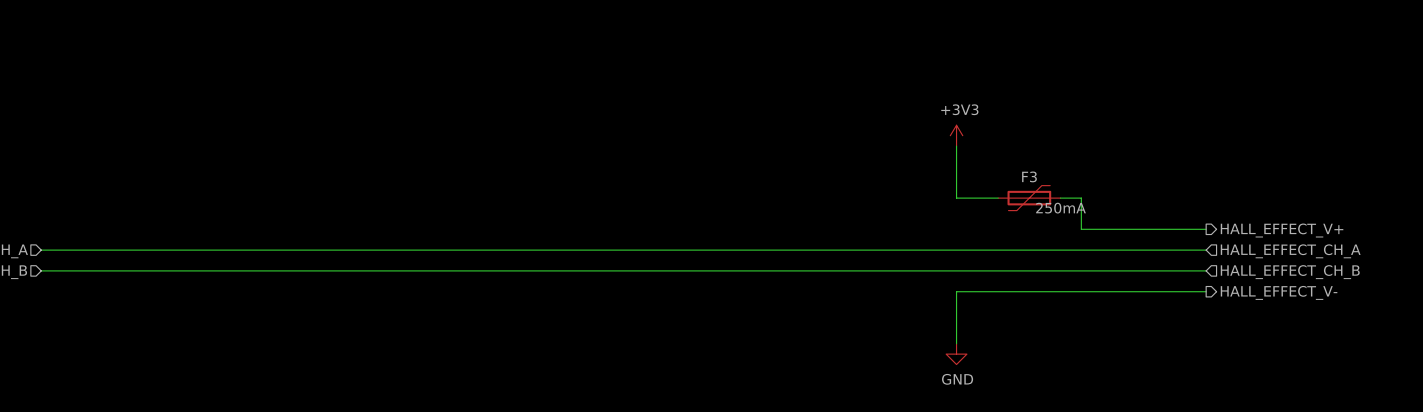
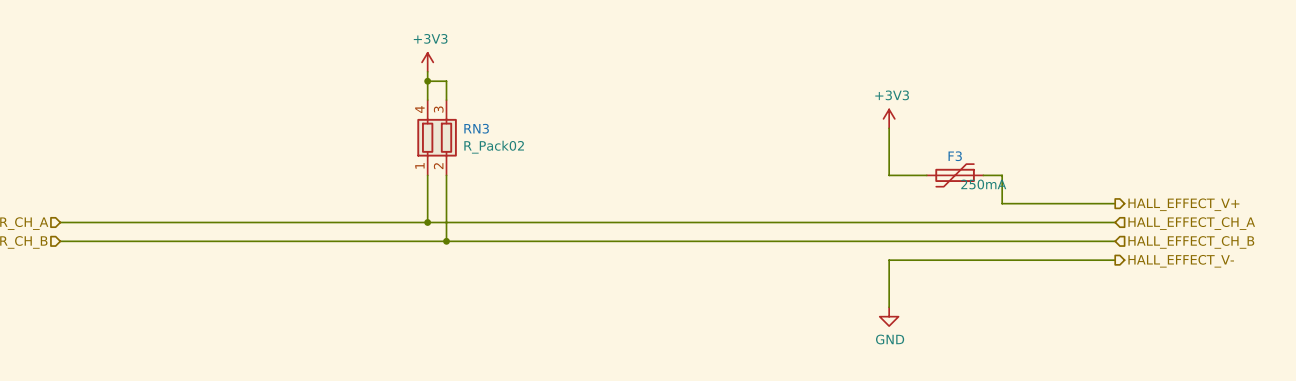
power symbol: none -> +3V3 (427, 62)
wire: none -> (427, 71) (427, 100)
wire: none -> (427, 81) (446, 81) (446, 100)
junction: none -> (427, 81)
RN3: none -> R_Pack02 (437, 137)
wire: none -> (427, 175) (427, 222)
wire: none -> (446, 175) (446, 241)
junction: none -> (427, 222)
junction: none -> (446, 241)

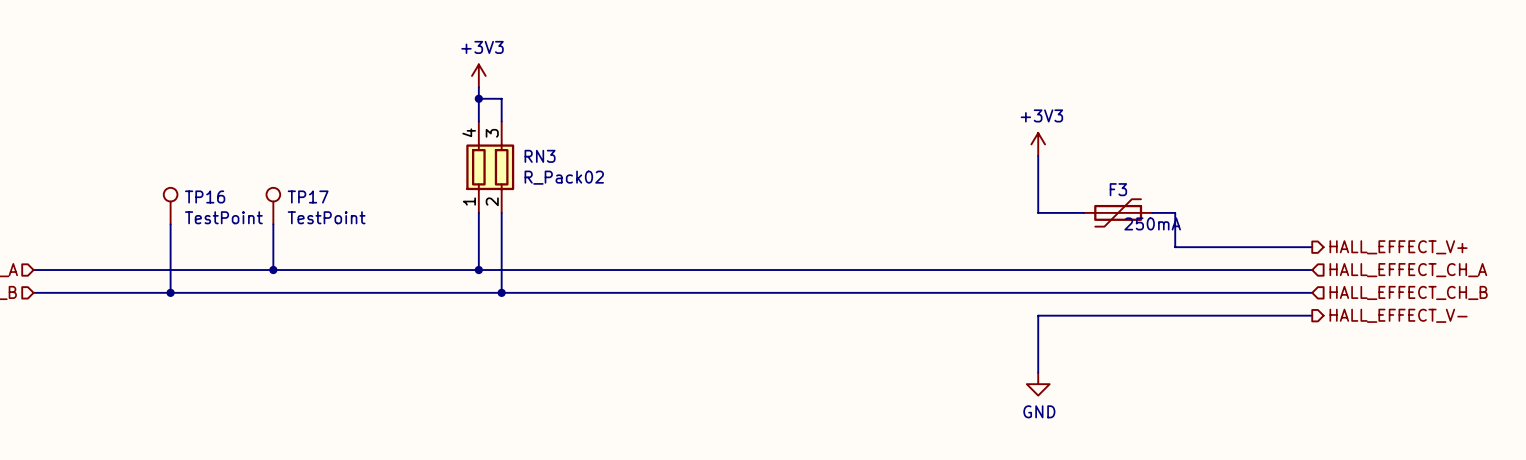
TP16: none -> TestPoint (170, 206)
TP17: none -> TestPoint (273, 206)
wire: none -> (170, 224) (170, 292)
wire: none -> (273, 224) (273, 270)
junction: none -> (273, 270)
junction: none -> (170, 292)

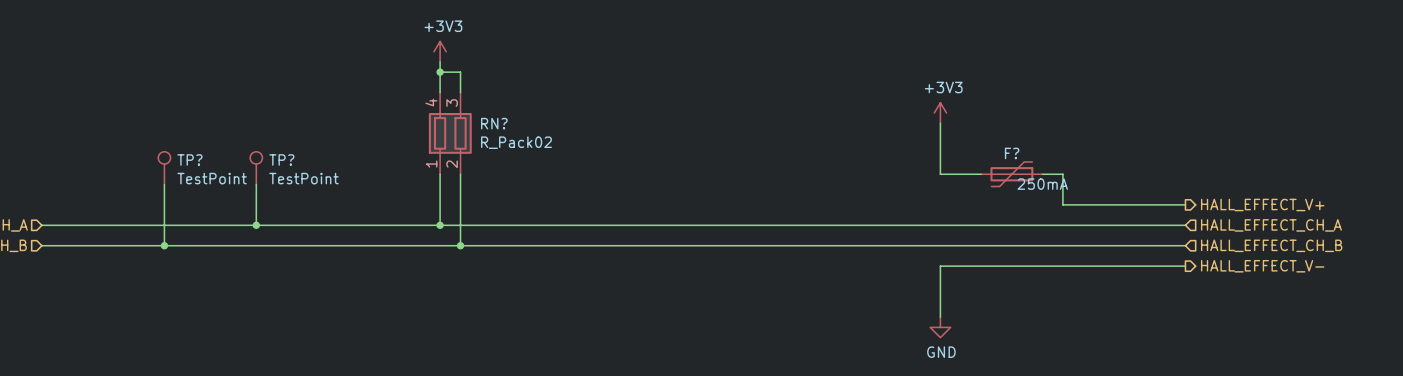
RN3 name: RN3 (540, 156) -> RN? (494, 123)
F3 name: F3 (1118, 189) -> F? (1012, 153)
TP16 name: TP16 (205, 196) -> TP? (189, 159)
TP17 name: TP17 (308, 196) -> TP? (281, 159)

